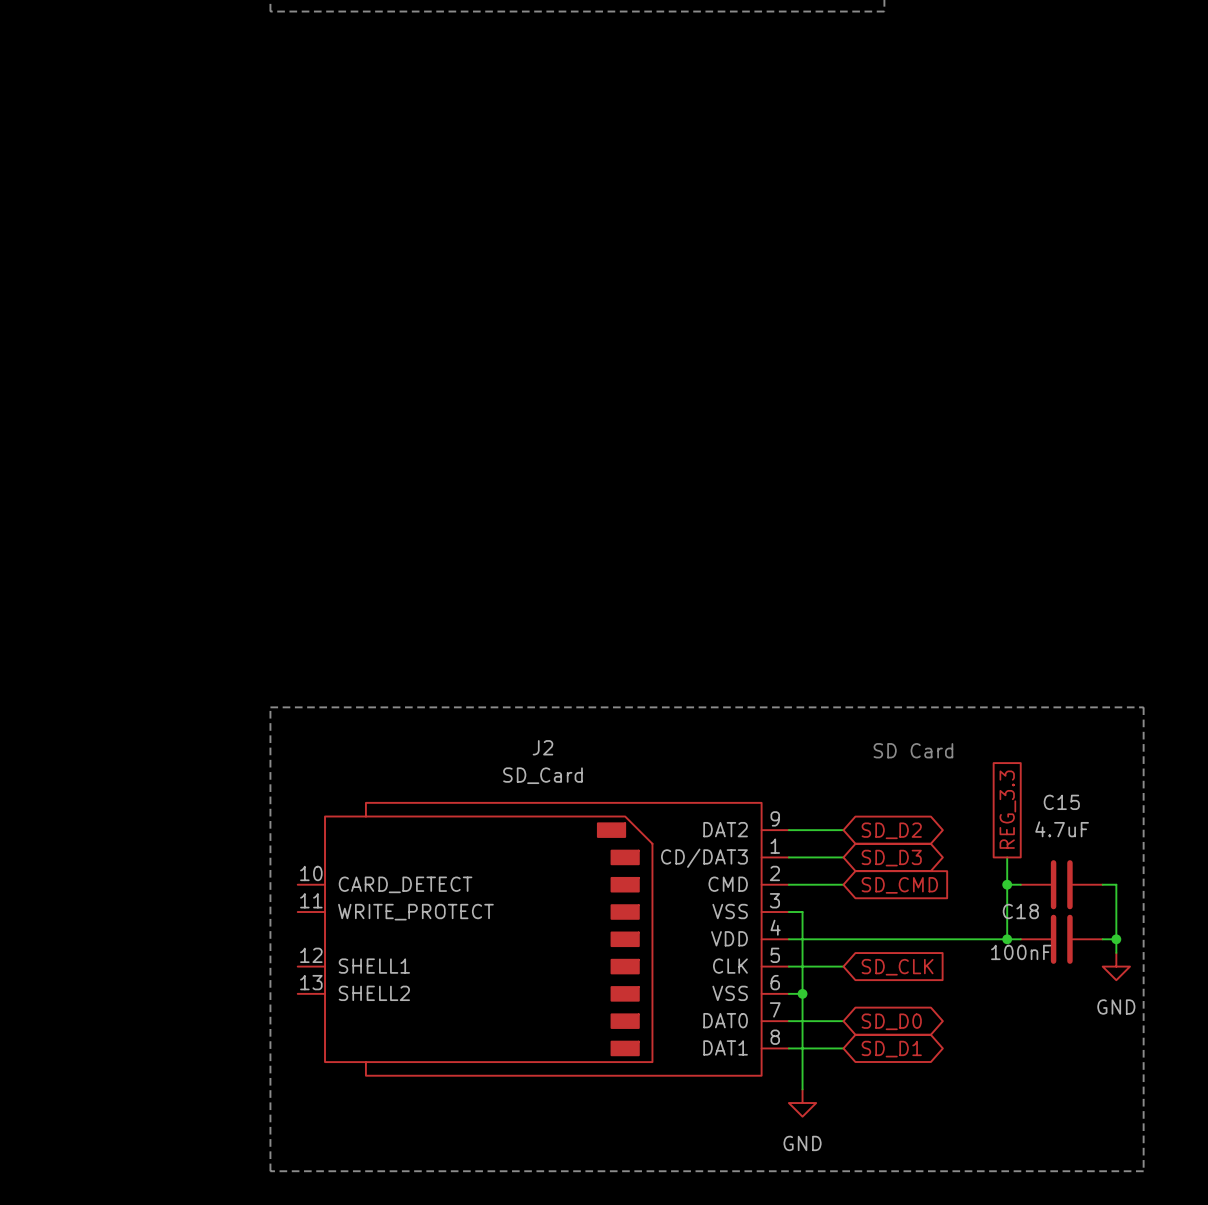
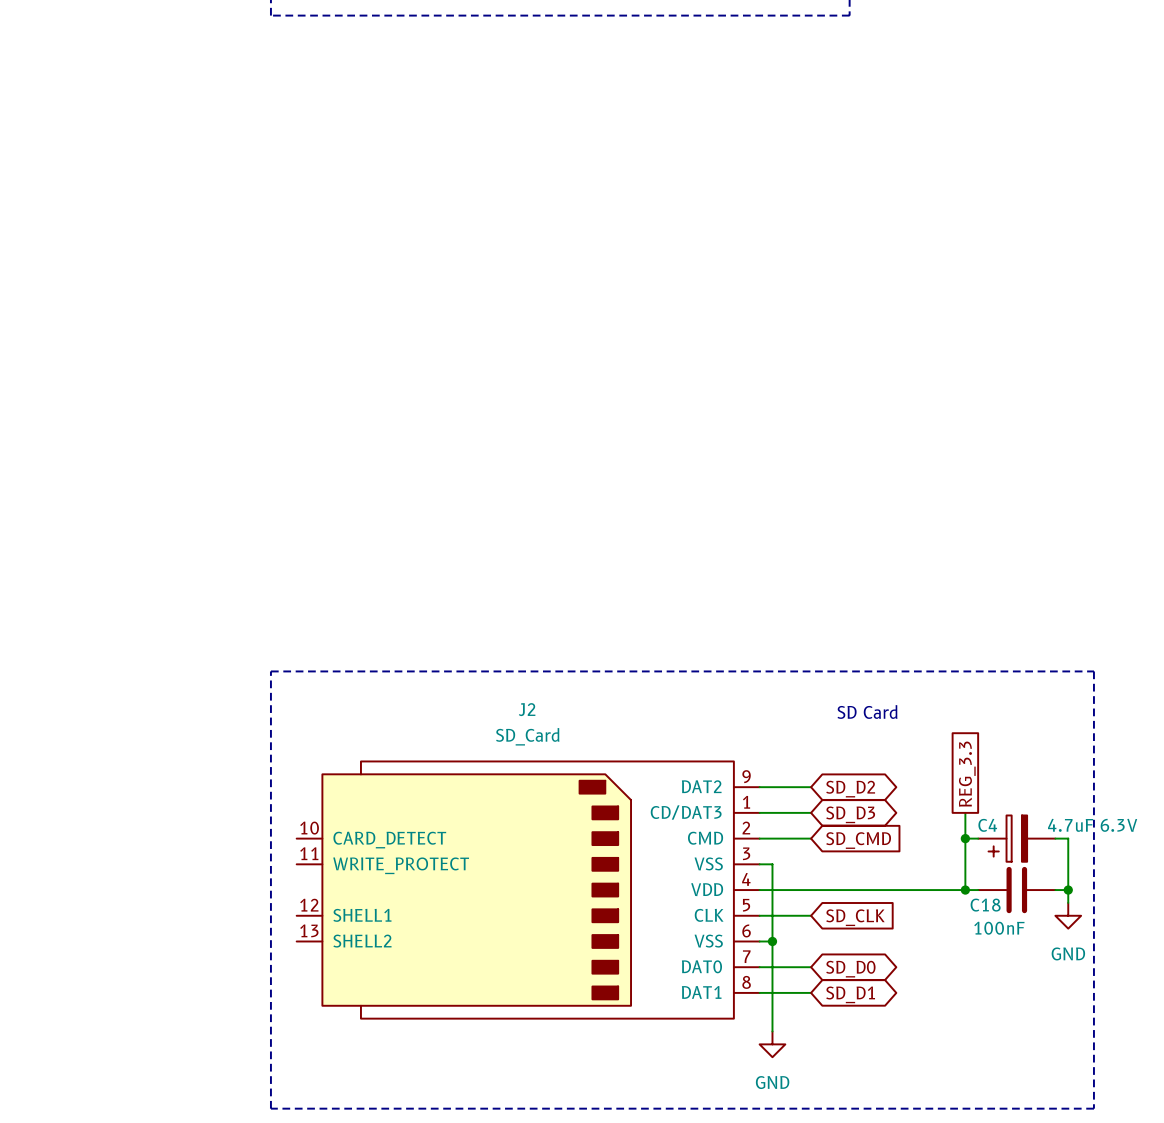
C15: 4.7uF (1061, 884) -> none
C4: none -> 4.7uF 6.3V (1016, 838)
C18 name position: C18 (1020, 911) -> C18 (985, 905)
C18 value position: 100nF (1021, 952) -> 100nF (999, 928)

